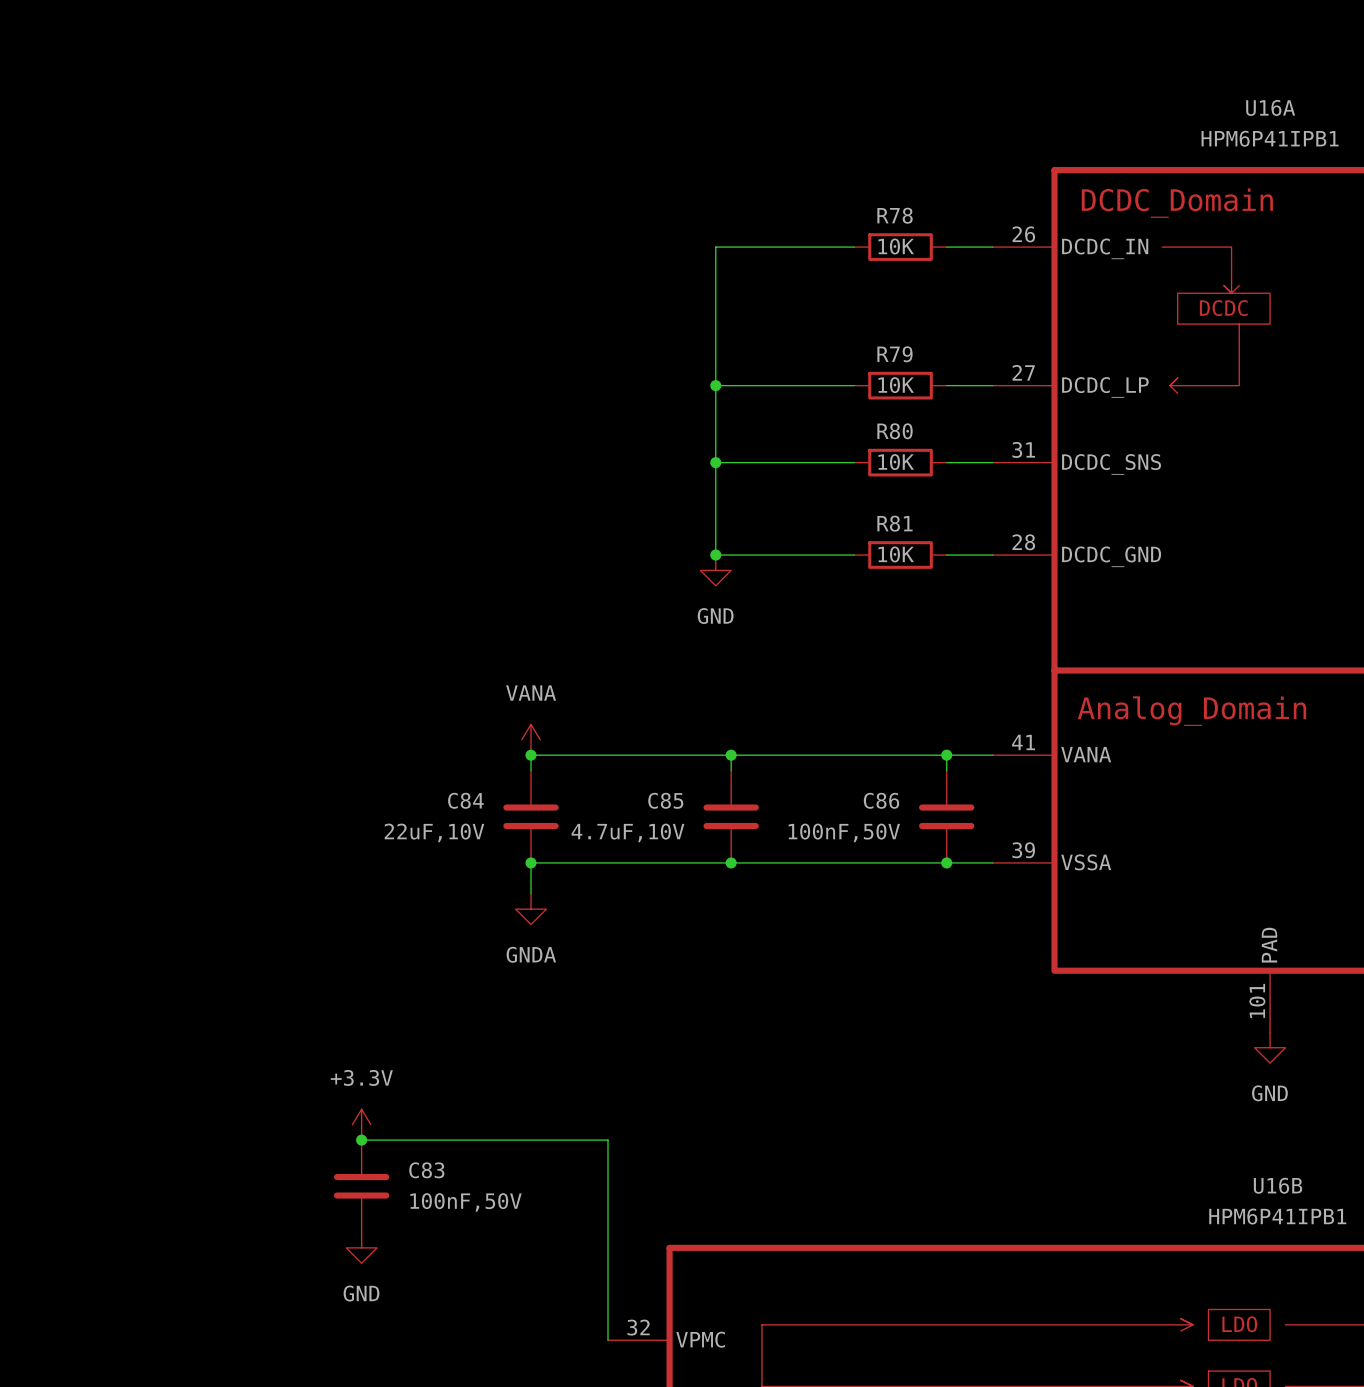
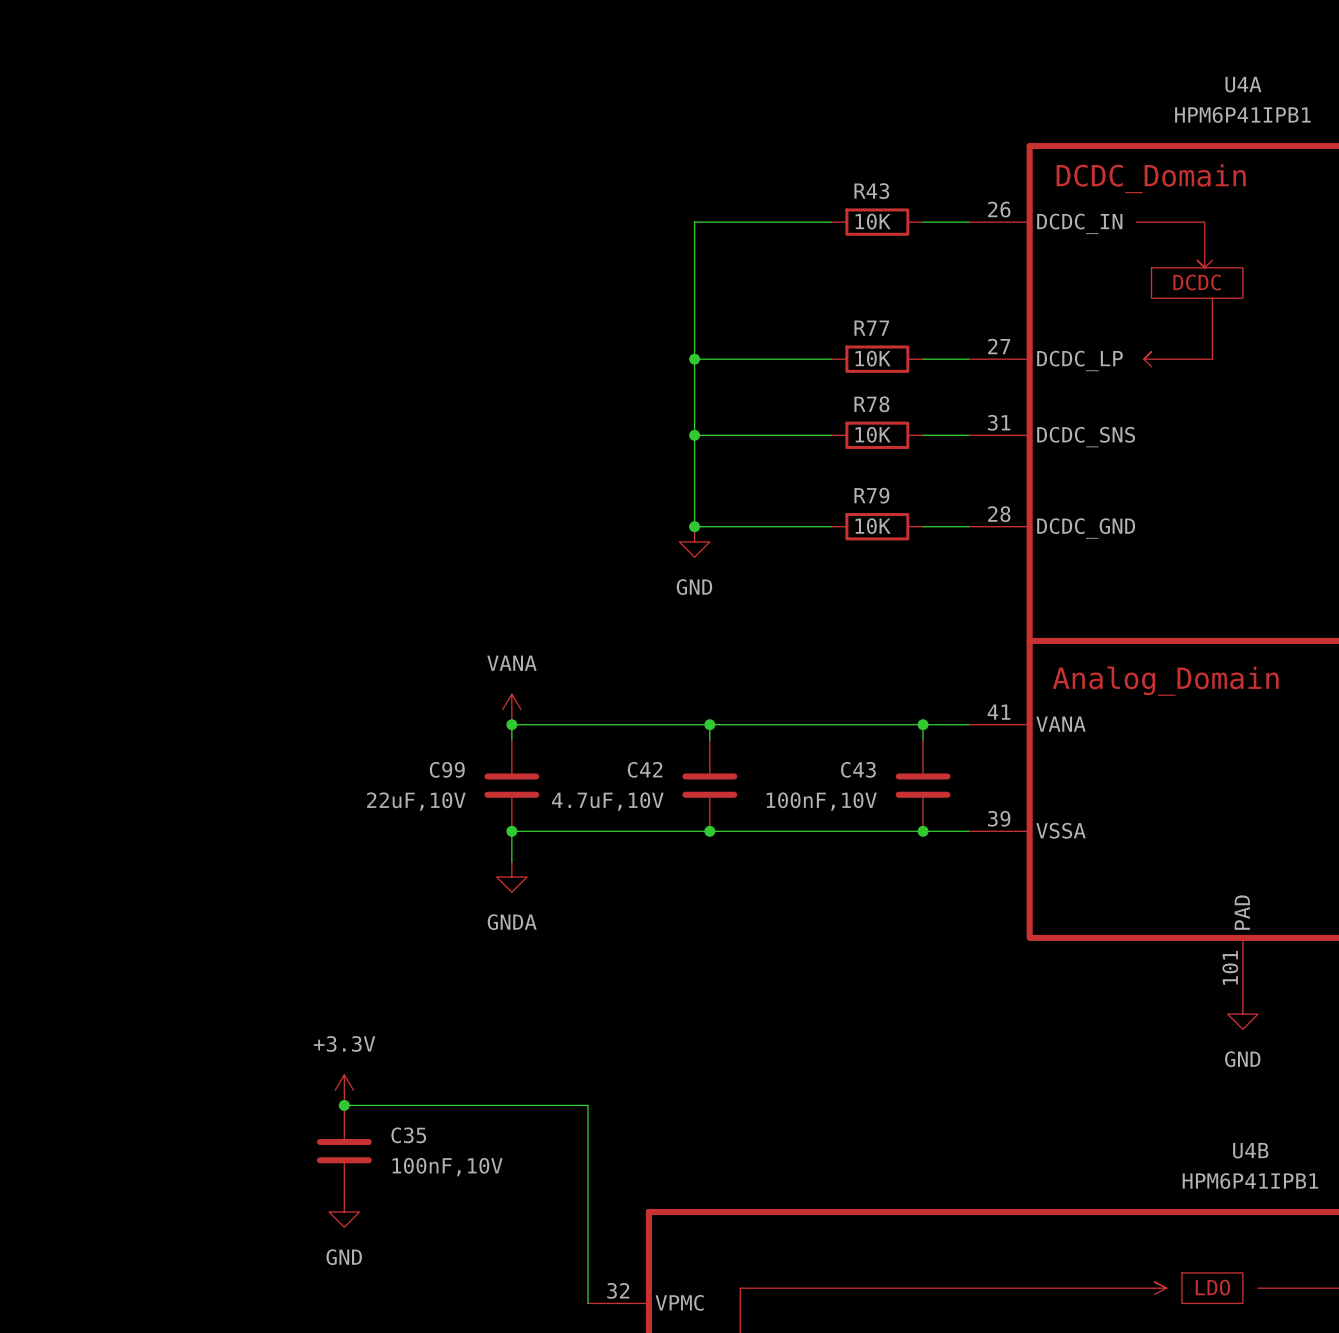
U16A name: U16A (1270, 107) -> U4A (1243, 84)
R78 name: R78 (895, 215) -> R43 (871, 191)
R79 name: R79 (894, 354) -> R77 (871, 328)
R80 name: R80 (895, 431) -> R78 (871, 404)
R81 name: R81 (894, 523) -> R79 (871, 495)
C84 name: C84 (465, 800) -> C99 (447, 769)
C85 name: C85 (665, 800) -> C42 (645, 769)
C86 name: C86 (881, 800) -> C43 (858, 769)
C86 value: 100nF,50V (844, 832) -> 100nF,10V (821, 801)
C83 name: C83 (426, 1170) -> C35 (408, 1135)
U16B name: U16B (1278, 1185) -> U4B (1250, 1150)
C83 value: 100nF,50V (466, 1202) -> 100nF,10V (447, 1167)

